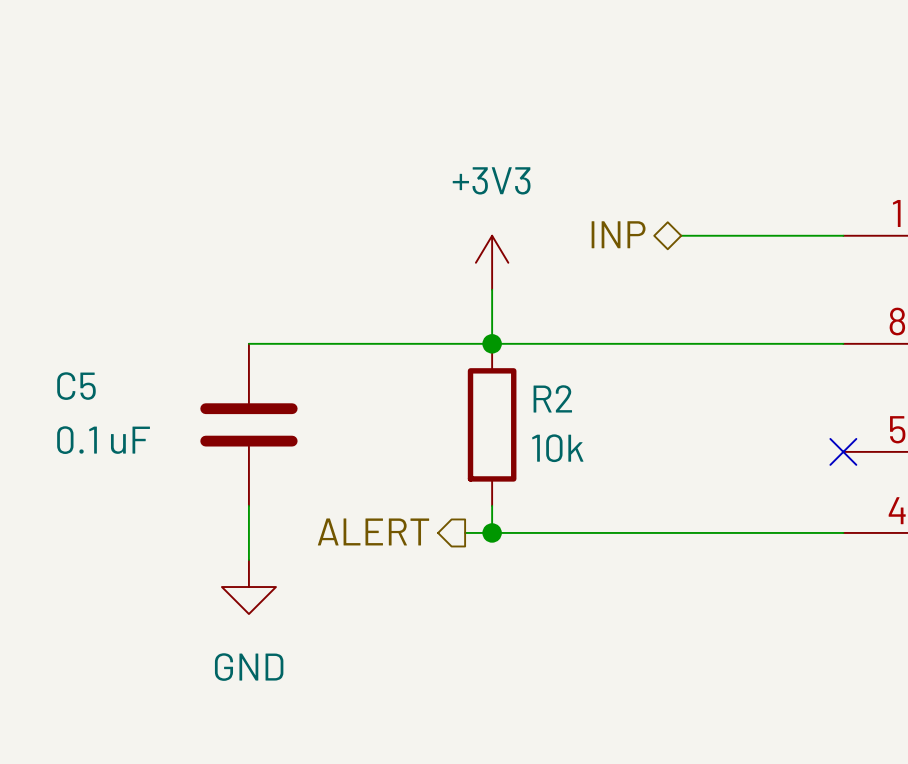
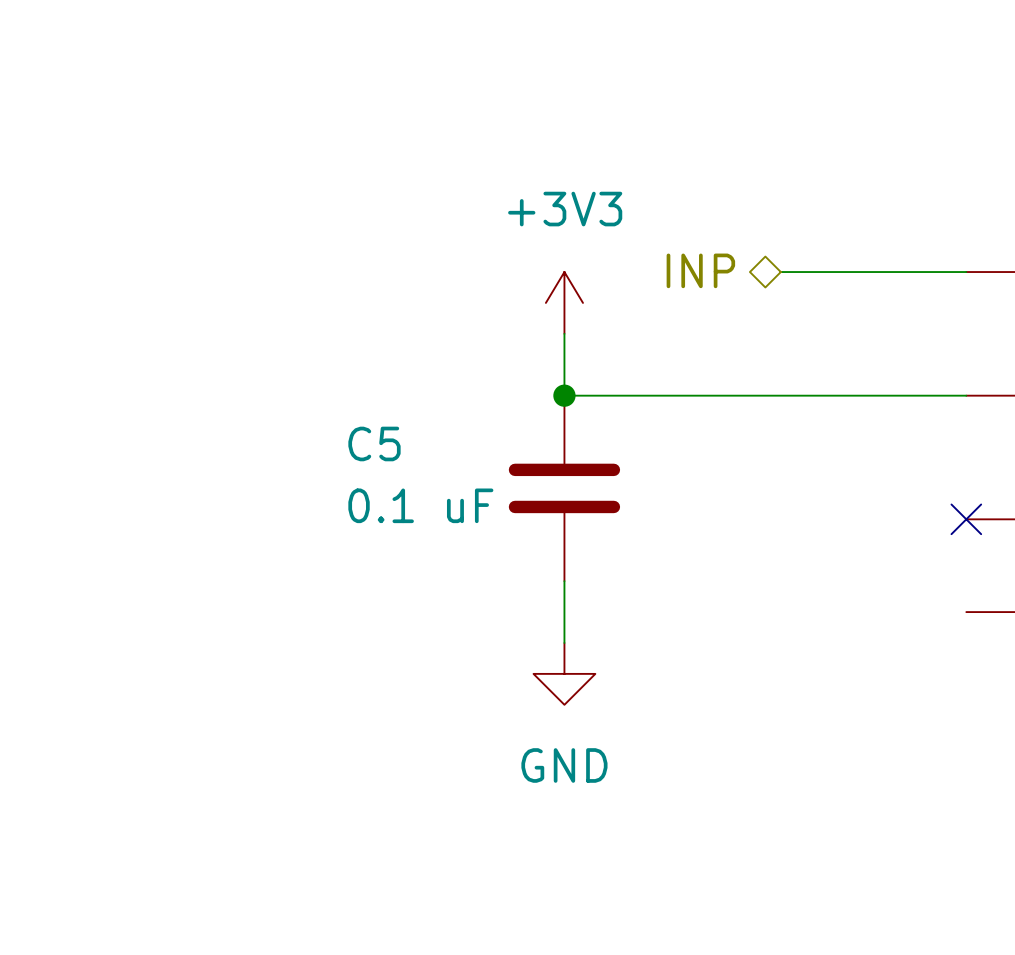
wire: (248, 343) (492, 343) -> none
C5 position: (248, 424) -> (564, 488)
R2: 10k (492, 424) -> none
wire: (248, 505) (248, 559) -> none
hierarchical label: ALERT (373, 531) -> none
wire: (465, 532) (843, 532) -> none
wire: none -> (564, 612) (564, 642)
junction: (492, 532) -> none
power symbol position: GND (248, 587) -> GND (564, 673)

